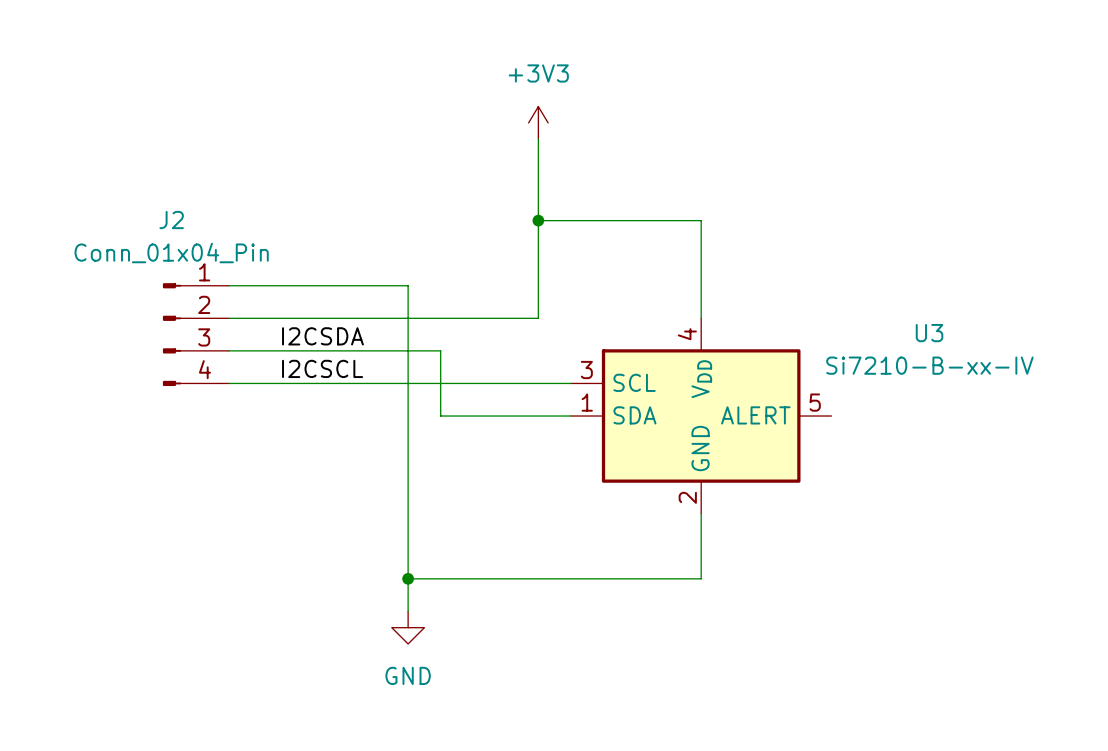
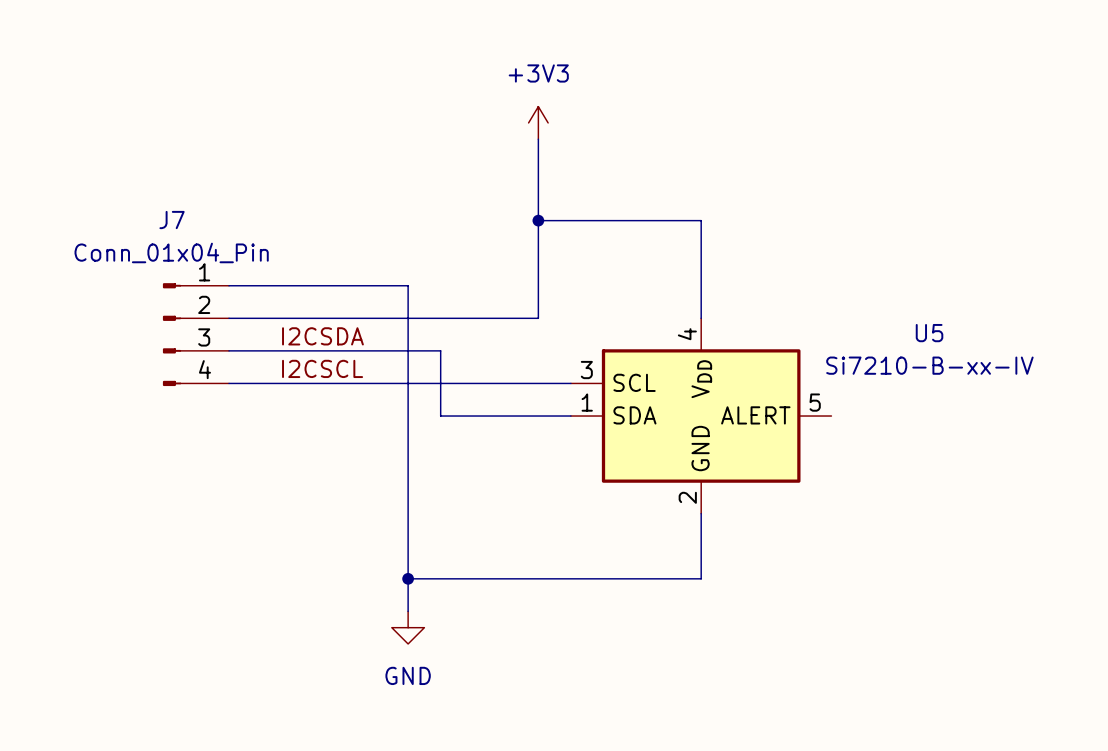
J2 name: J2 (171, 220) -> J7 (172, 220)
U3 name: U3 (929, 333) -> U5 (929, 333)

